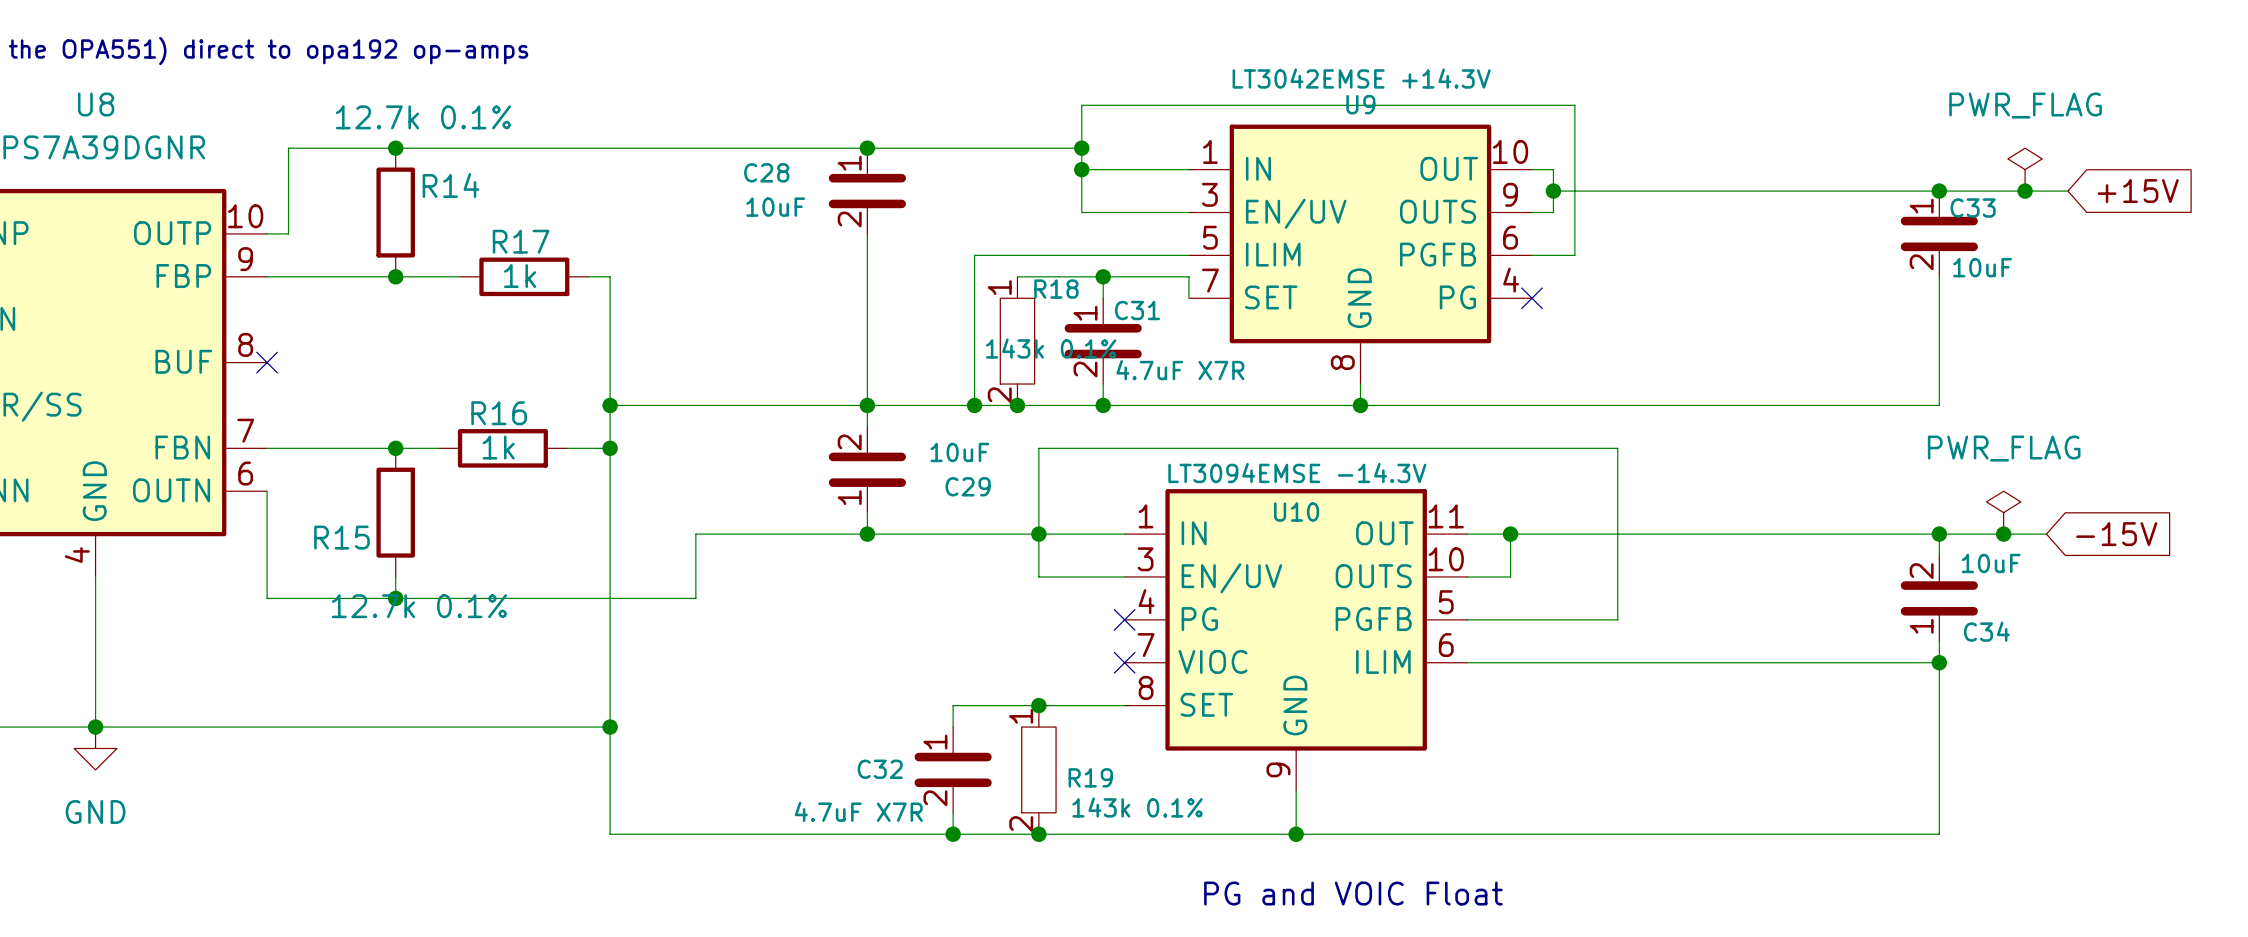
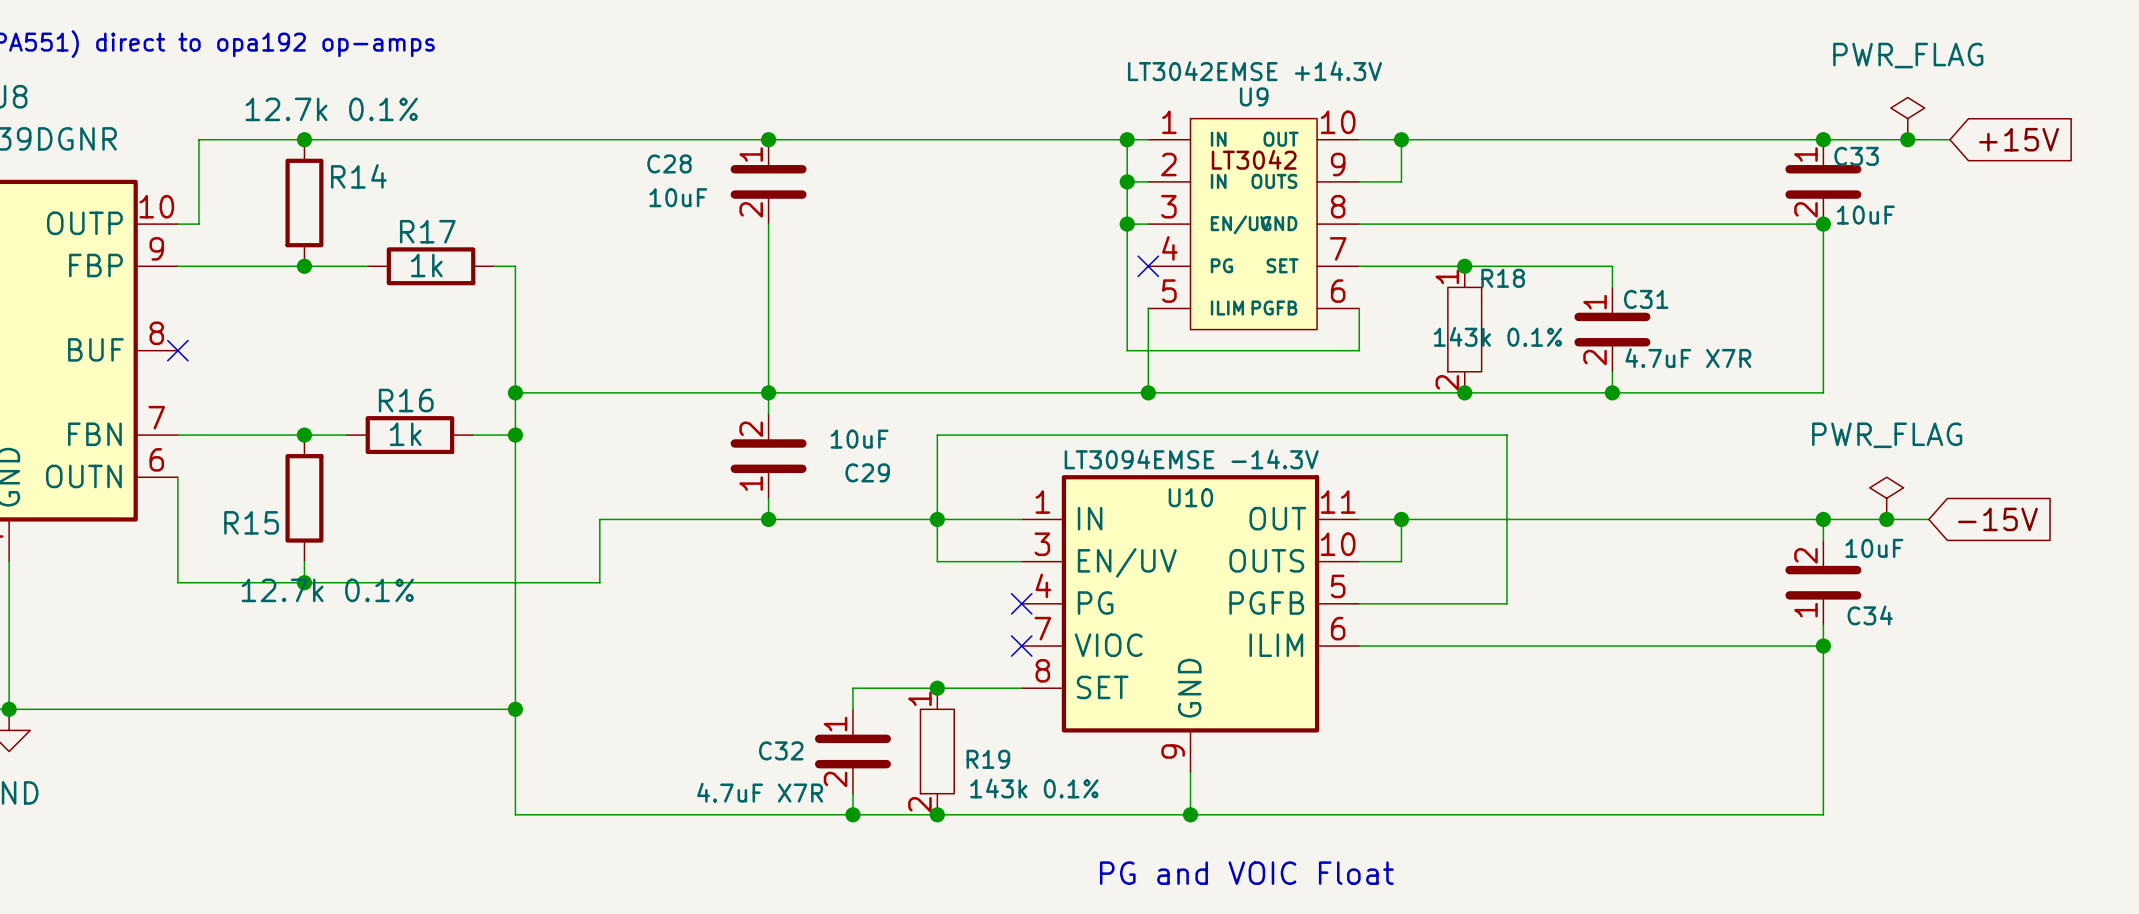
U9 symbol: [1188, 124, 1532, 385] -> [1148, 118, 1360, 330]
wire: none -> (979, 139) (1148, 139)
junction: (1081, 148) -> none
wire: none -> (1127, 139) (1127, 350) (1359, 350) (1359, 308)
junction: none -> (1127, 139)
wire: none -> (1359, 139) (1949, 139)
wire: none -> (1401, 139) (1401, 181) (1359, 181)
junction: none -> (1401, 139)
junction: none -> (1823, 139)
wire: (1081, 169) (1188, 169) -> none
junction: (1081, 169) -> none
wire: (1531, 169) (1553, 169) (1553, 212) (1531, 212) -> none
power symbol position: PWR_FLAG (2025, 169) -> PWR_FLAG (1907, 118)
junction: none -> (1127, 181)
wire: (1553, 191) (2067, 191) -> none
junction: (1553, 191) -> none
junction: (1939, 191) -> none
junction position: (2025, 191) -> (1907, 139)
global label position: +15V (2138, 191) -> +15V (2019, 139)
wire: (1188, 212) (1081, 212) (1081, 105) (1574, 105) (1574, 255) (1531, 255) -> none
junction: none -> (1127, 224)
wire: none -> (1359, 224) (1823, 224) (1823, 266)
junction: none -> (1823, 224)
C33 position: (1939, 233) -> (1823, 181)
wire: (1188, 255) (974, 255) (974, 405) -> none
wire: (1017, 276) (1188, 276) (1188, 298) -> none
wire: (1103, 276) (1103, 298) -> none
junction: (1103, 276) -> none
no-connect mark: none -> (1148, 266)
wire: none -> (1359, 266) (1612, 266) (1612, 287)
junction: none -> (1464, 266)
no-connect mark: (1531, 298) -> none
wire: none -> (1148, 308) (1148, 392)
R18 position: (1017, 341) -> (1464, 329)
C31 position: (1103, 341) -> (1612, 329)
wire: (1103, 384) (1103, 405) -> none
wire: (1360, 384) (1360, 405) -> (1612, 371) (1612, 392)
junction: (974, 405) -> none
junction: (1017, 405) -> none
junction: (1103, 405) -> none
junction: none -> (1148, 392)
junction: (1360, 405) -> none
junction: none -> (1464, 392)
junction: none -> (1612, 392)

